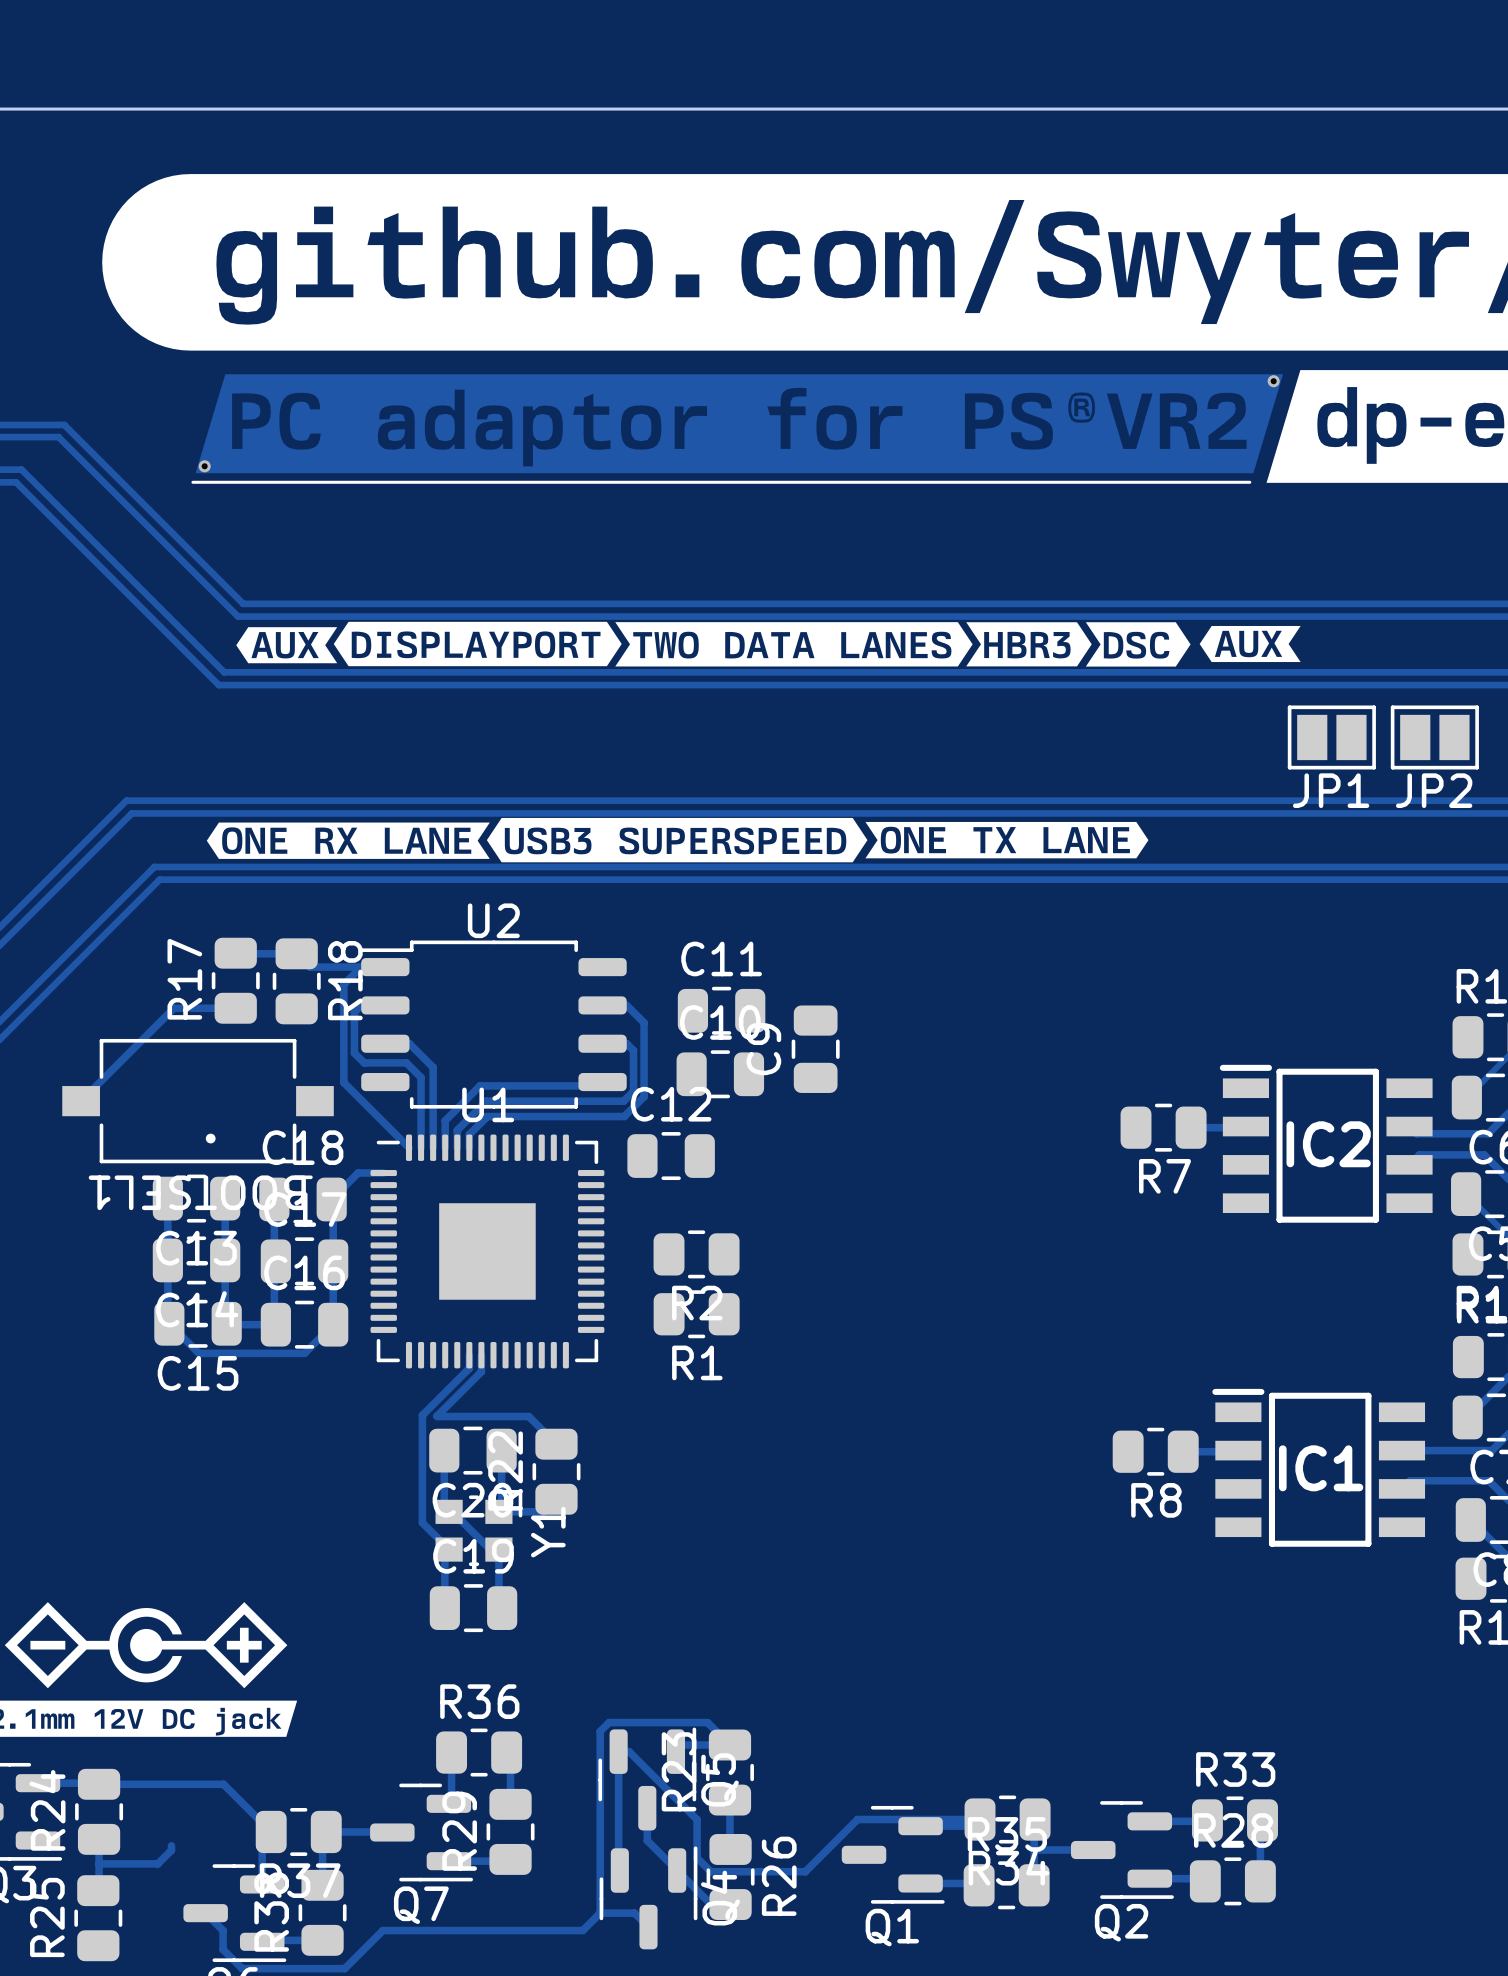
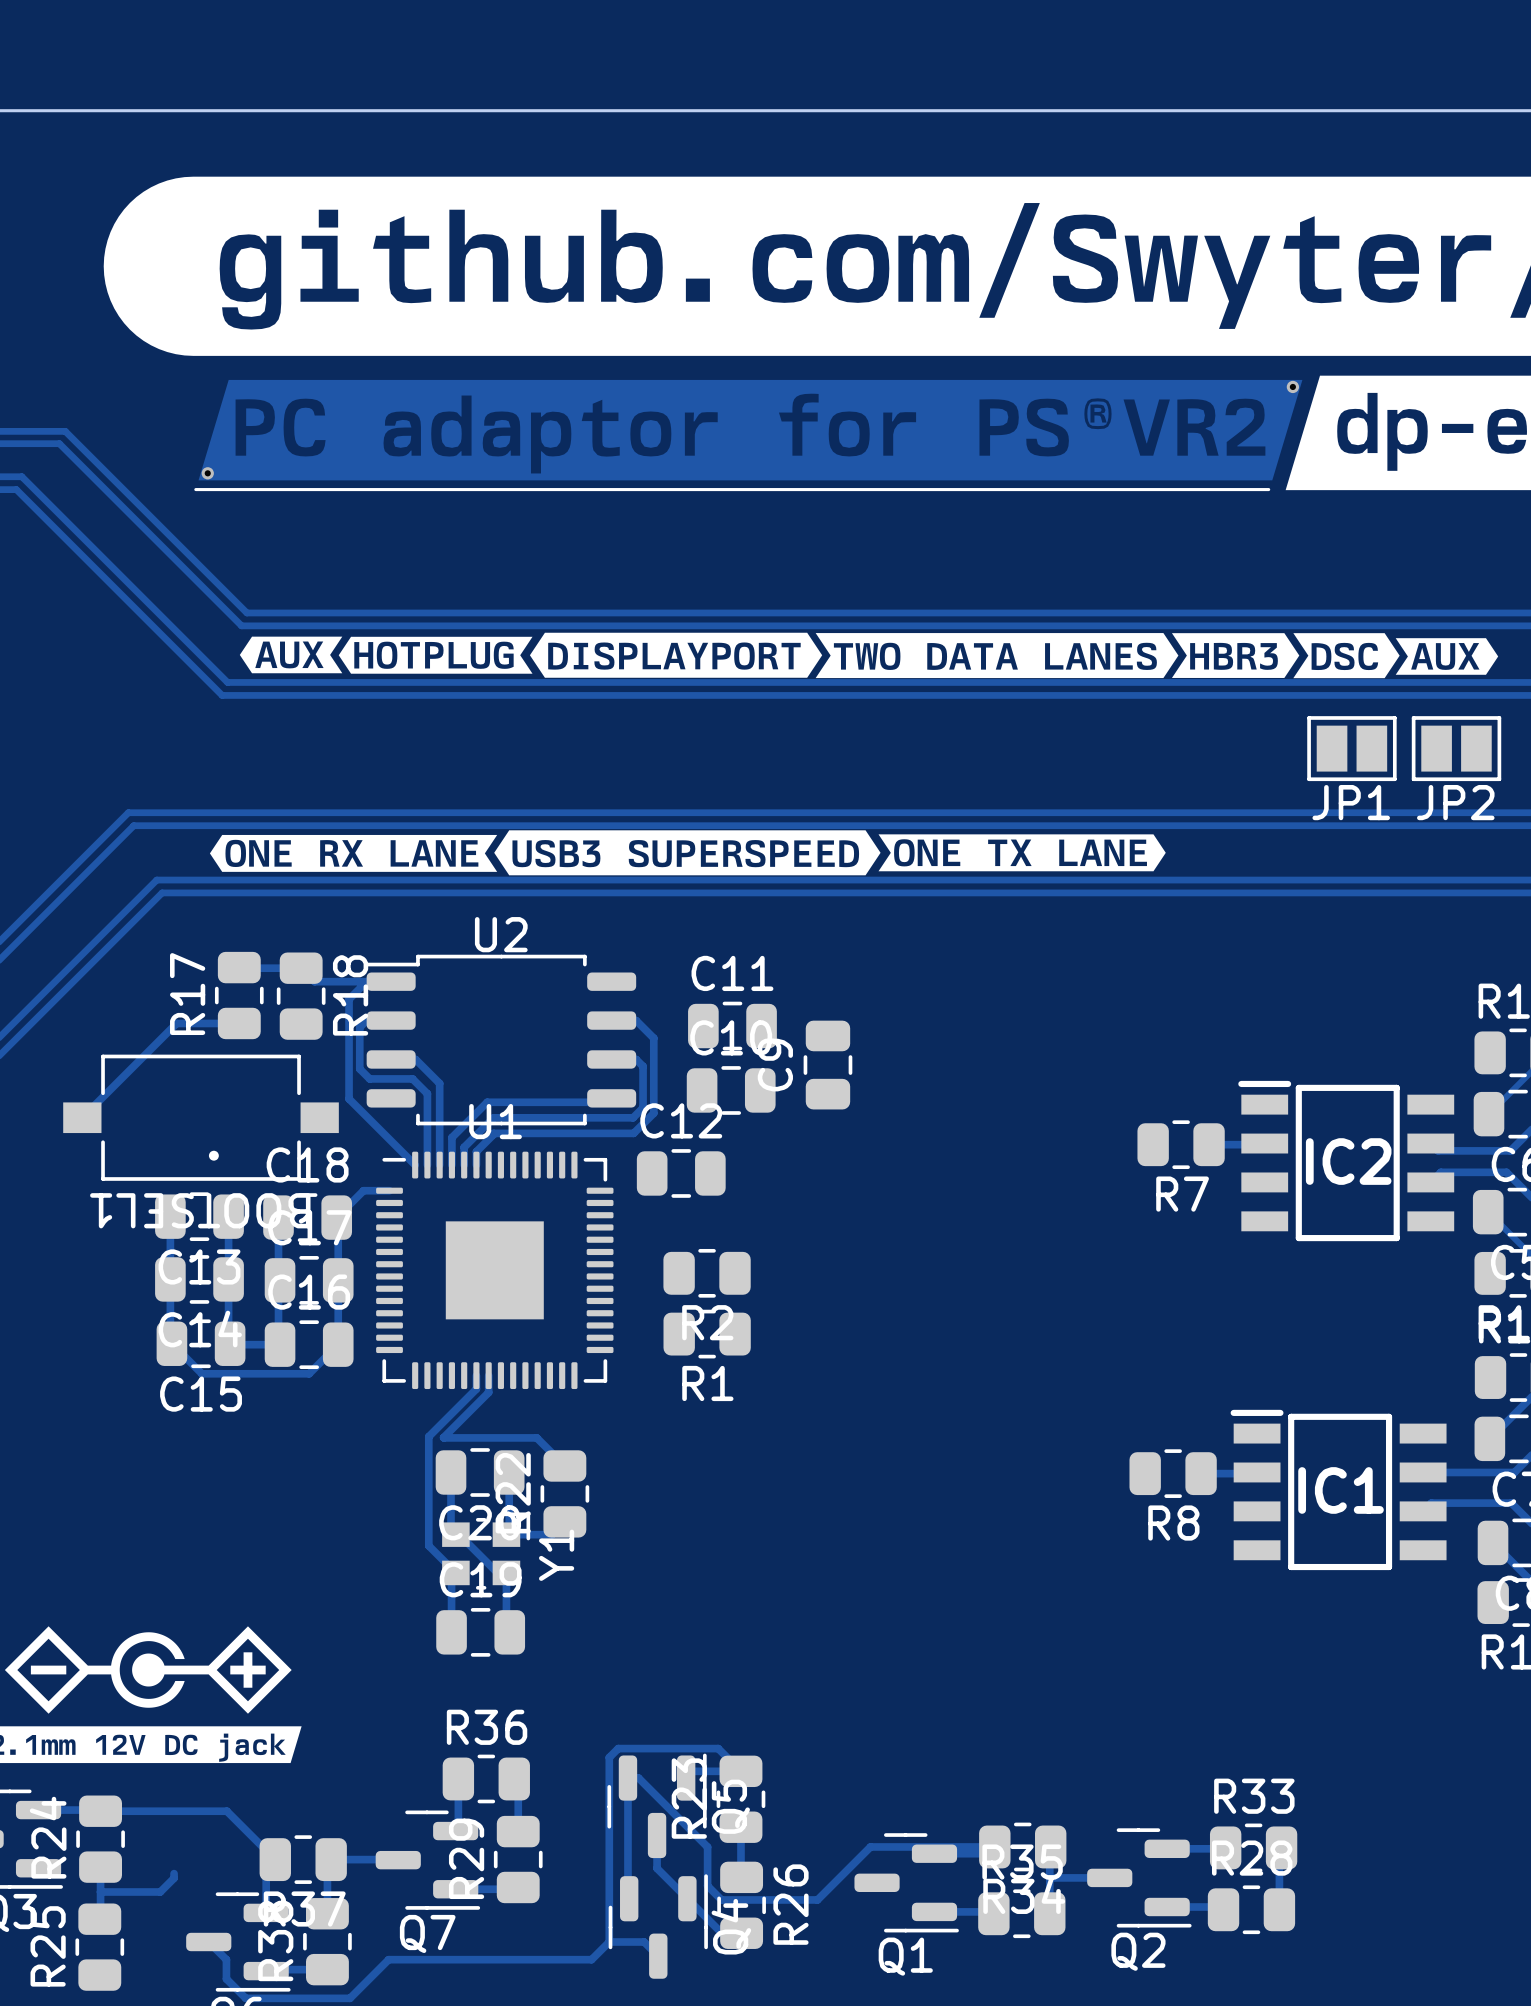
drawing: [1199, 625, 1301, 663] -> none
drawing: none -> [338, 636, 533, 674]
drawing: none -> [1395, 638, 1499, 675]
drawing position: (477, 644) -> (676, 655)
drawing position: (793, 644) -> (997, 655)
drawing position: (1028, 644) -> (1235, 655)
drawing position: (1138, 644) -> (1346, 655)

